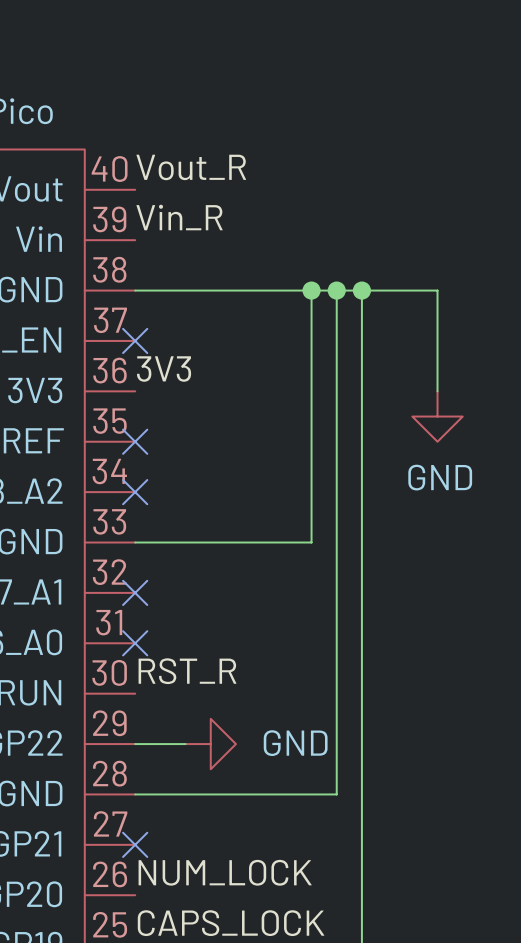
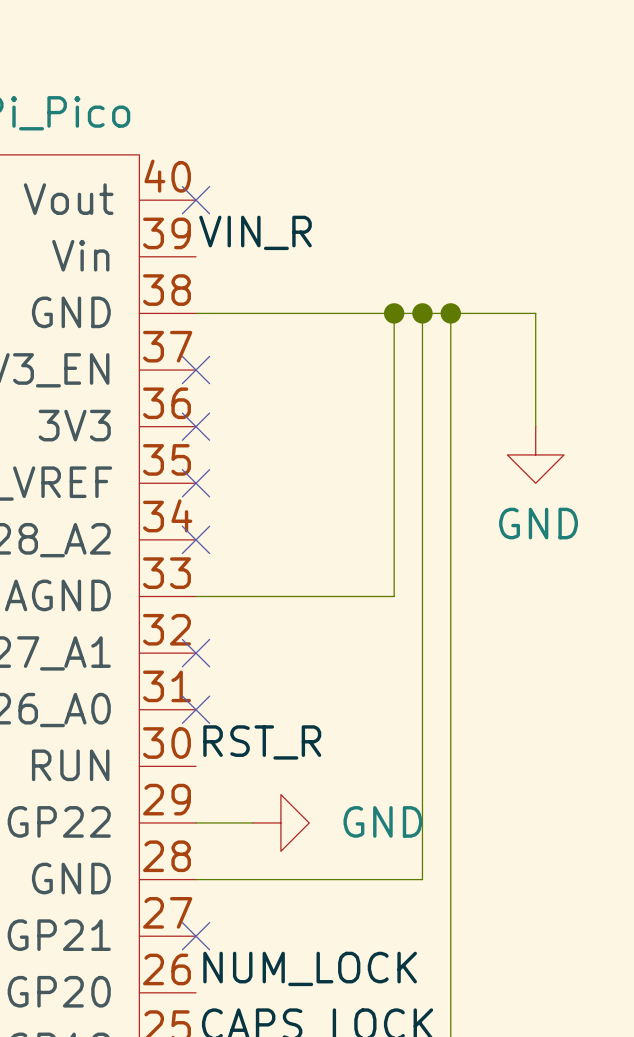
label: Vout_R (191, 167) -> none
no-connect mark: none -> (195, 200)
label: Vin_R (179, 217) -> VIN_R (255, 232)
label: 3V3 (164, 369) -> none
no-connect mark: none -> (195, 426)

